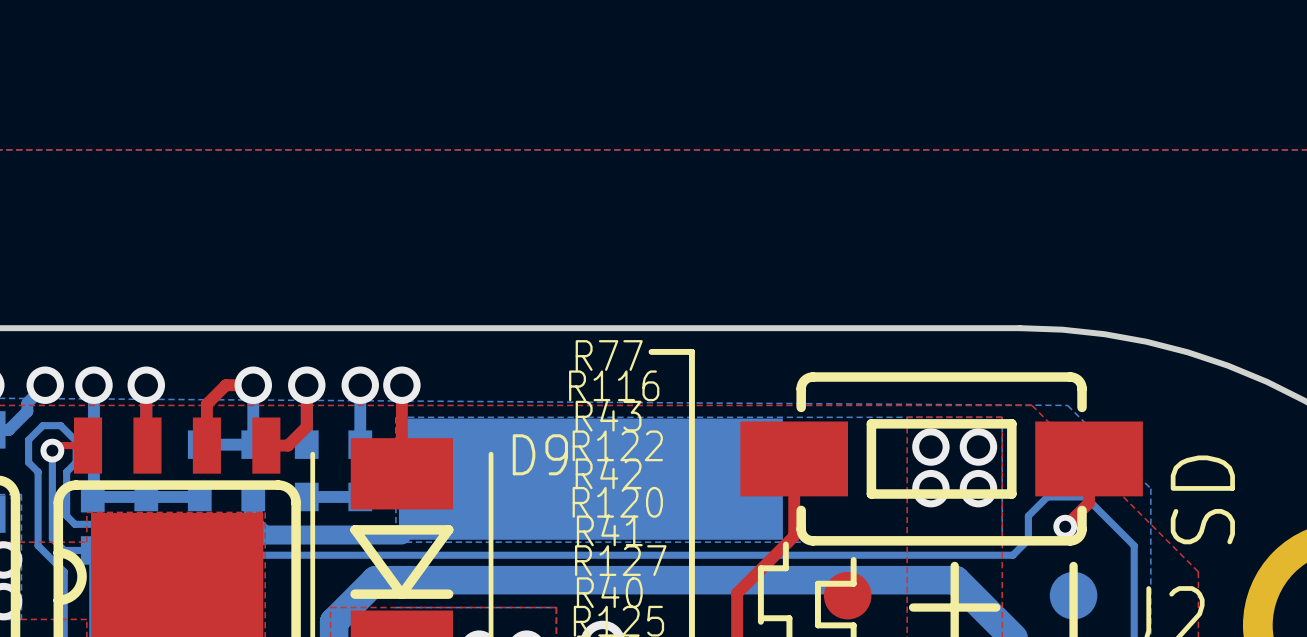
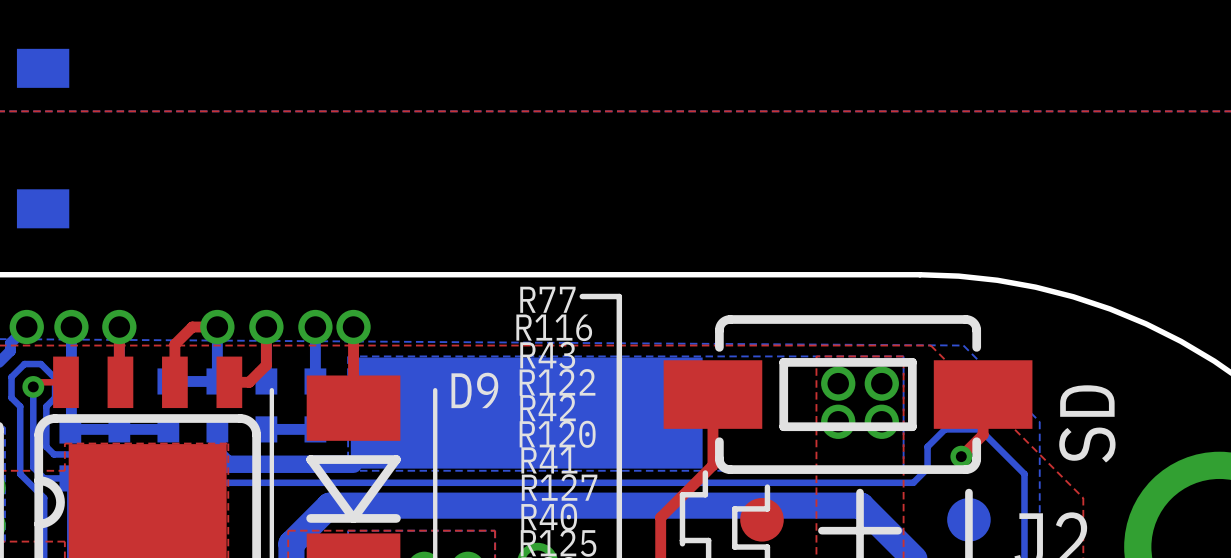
part: none -> (43, 138)

